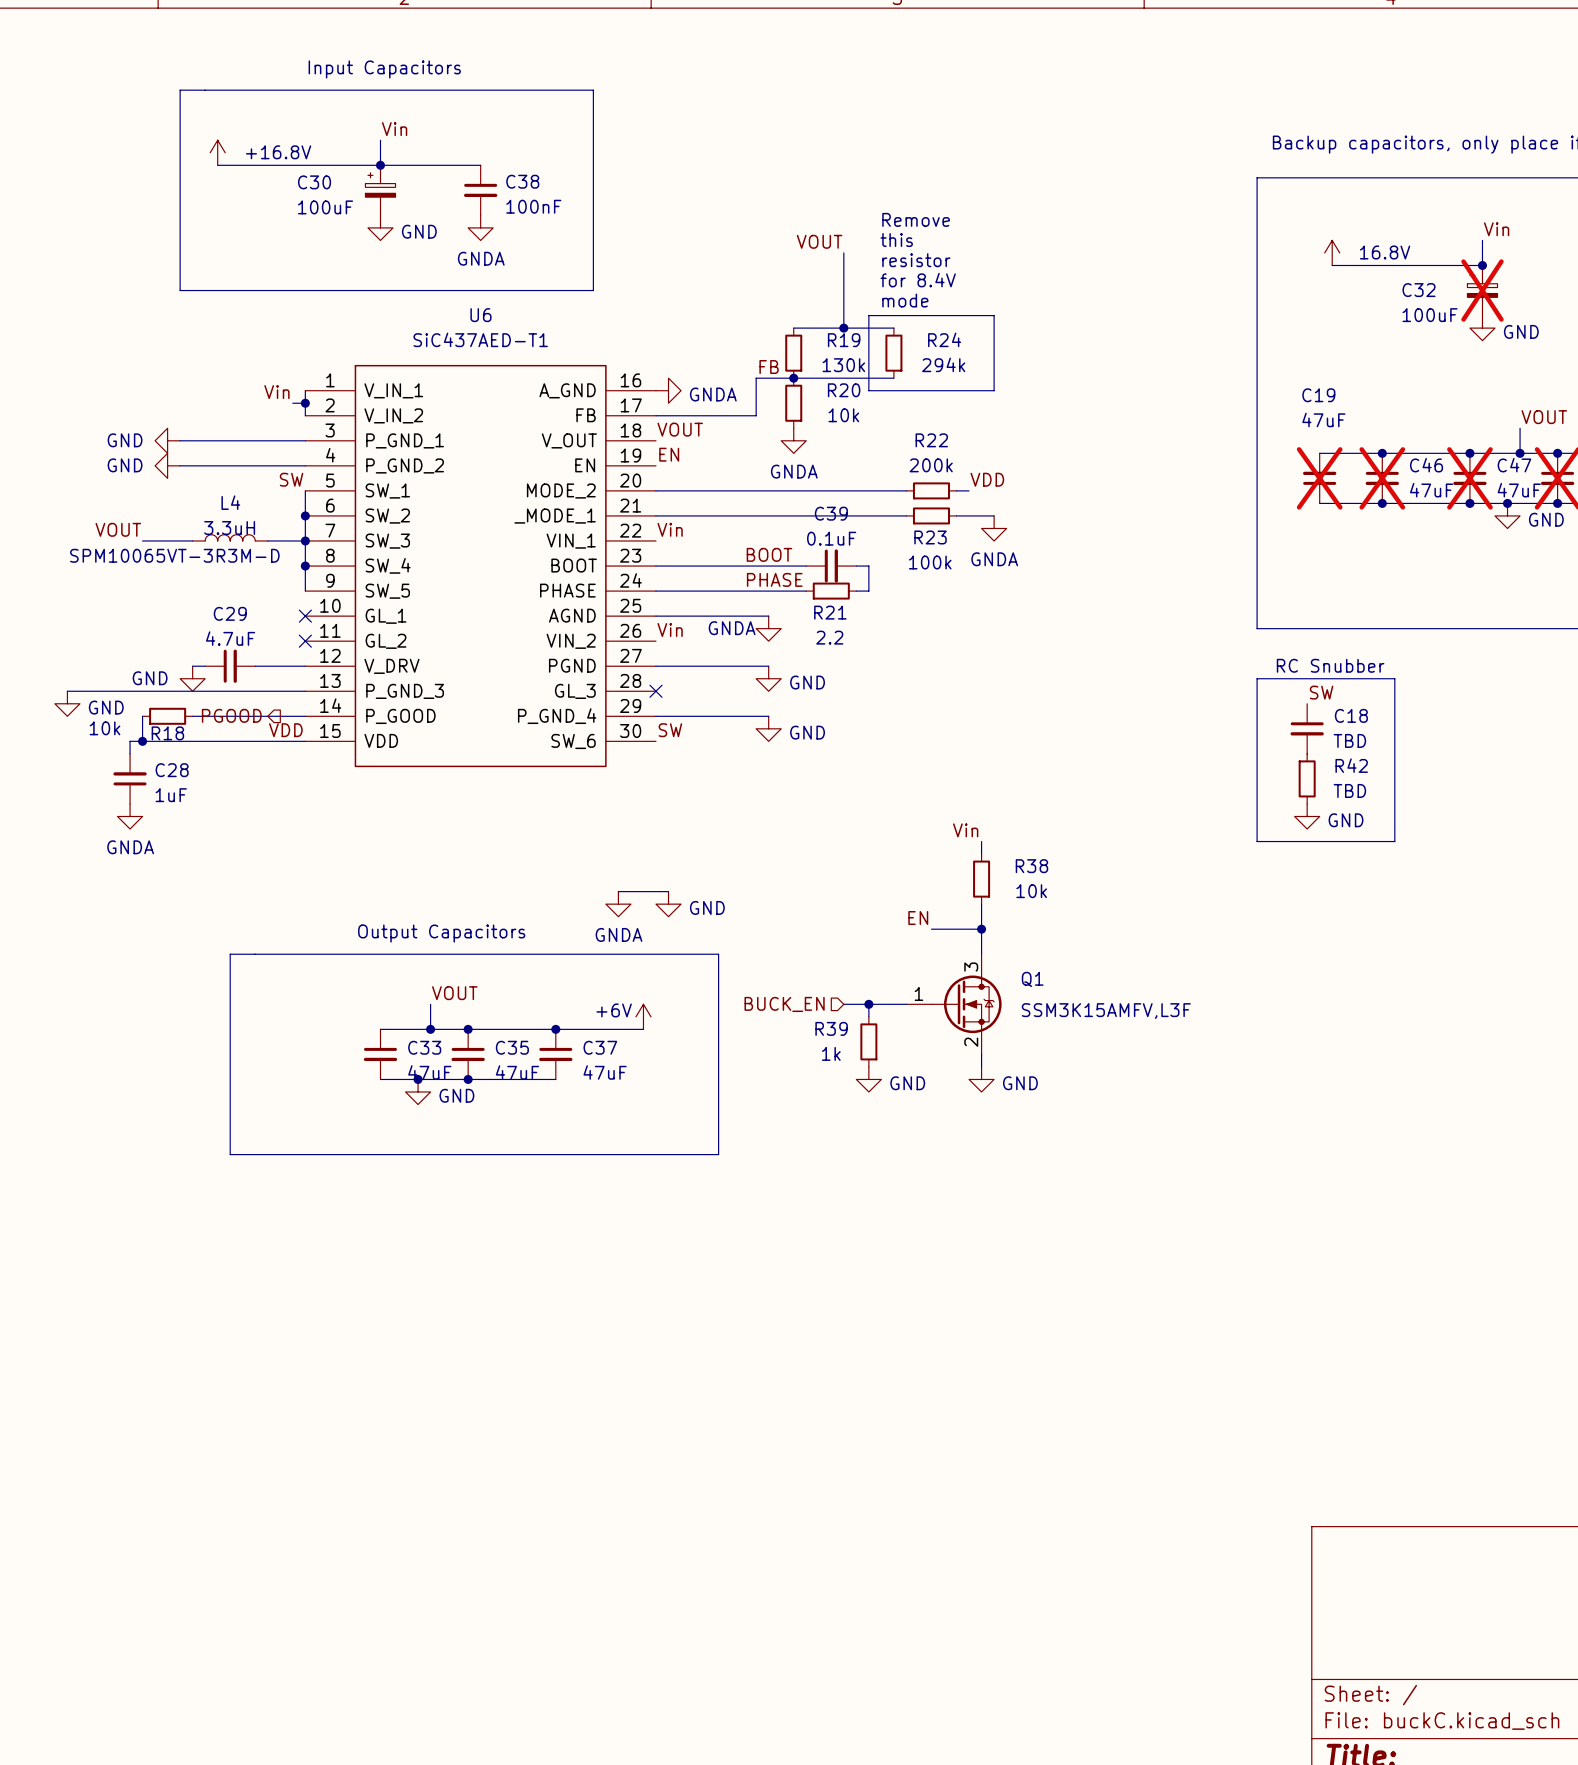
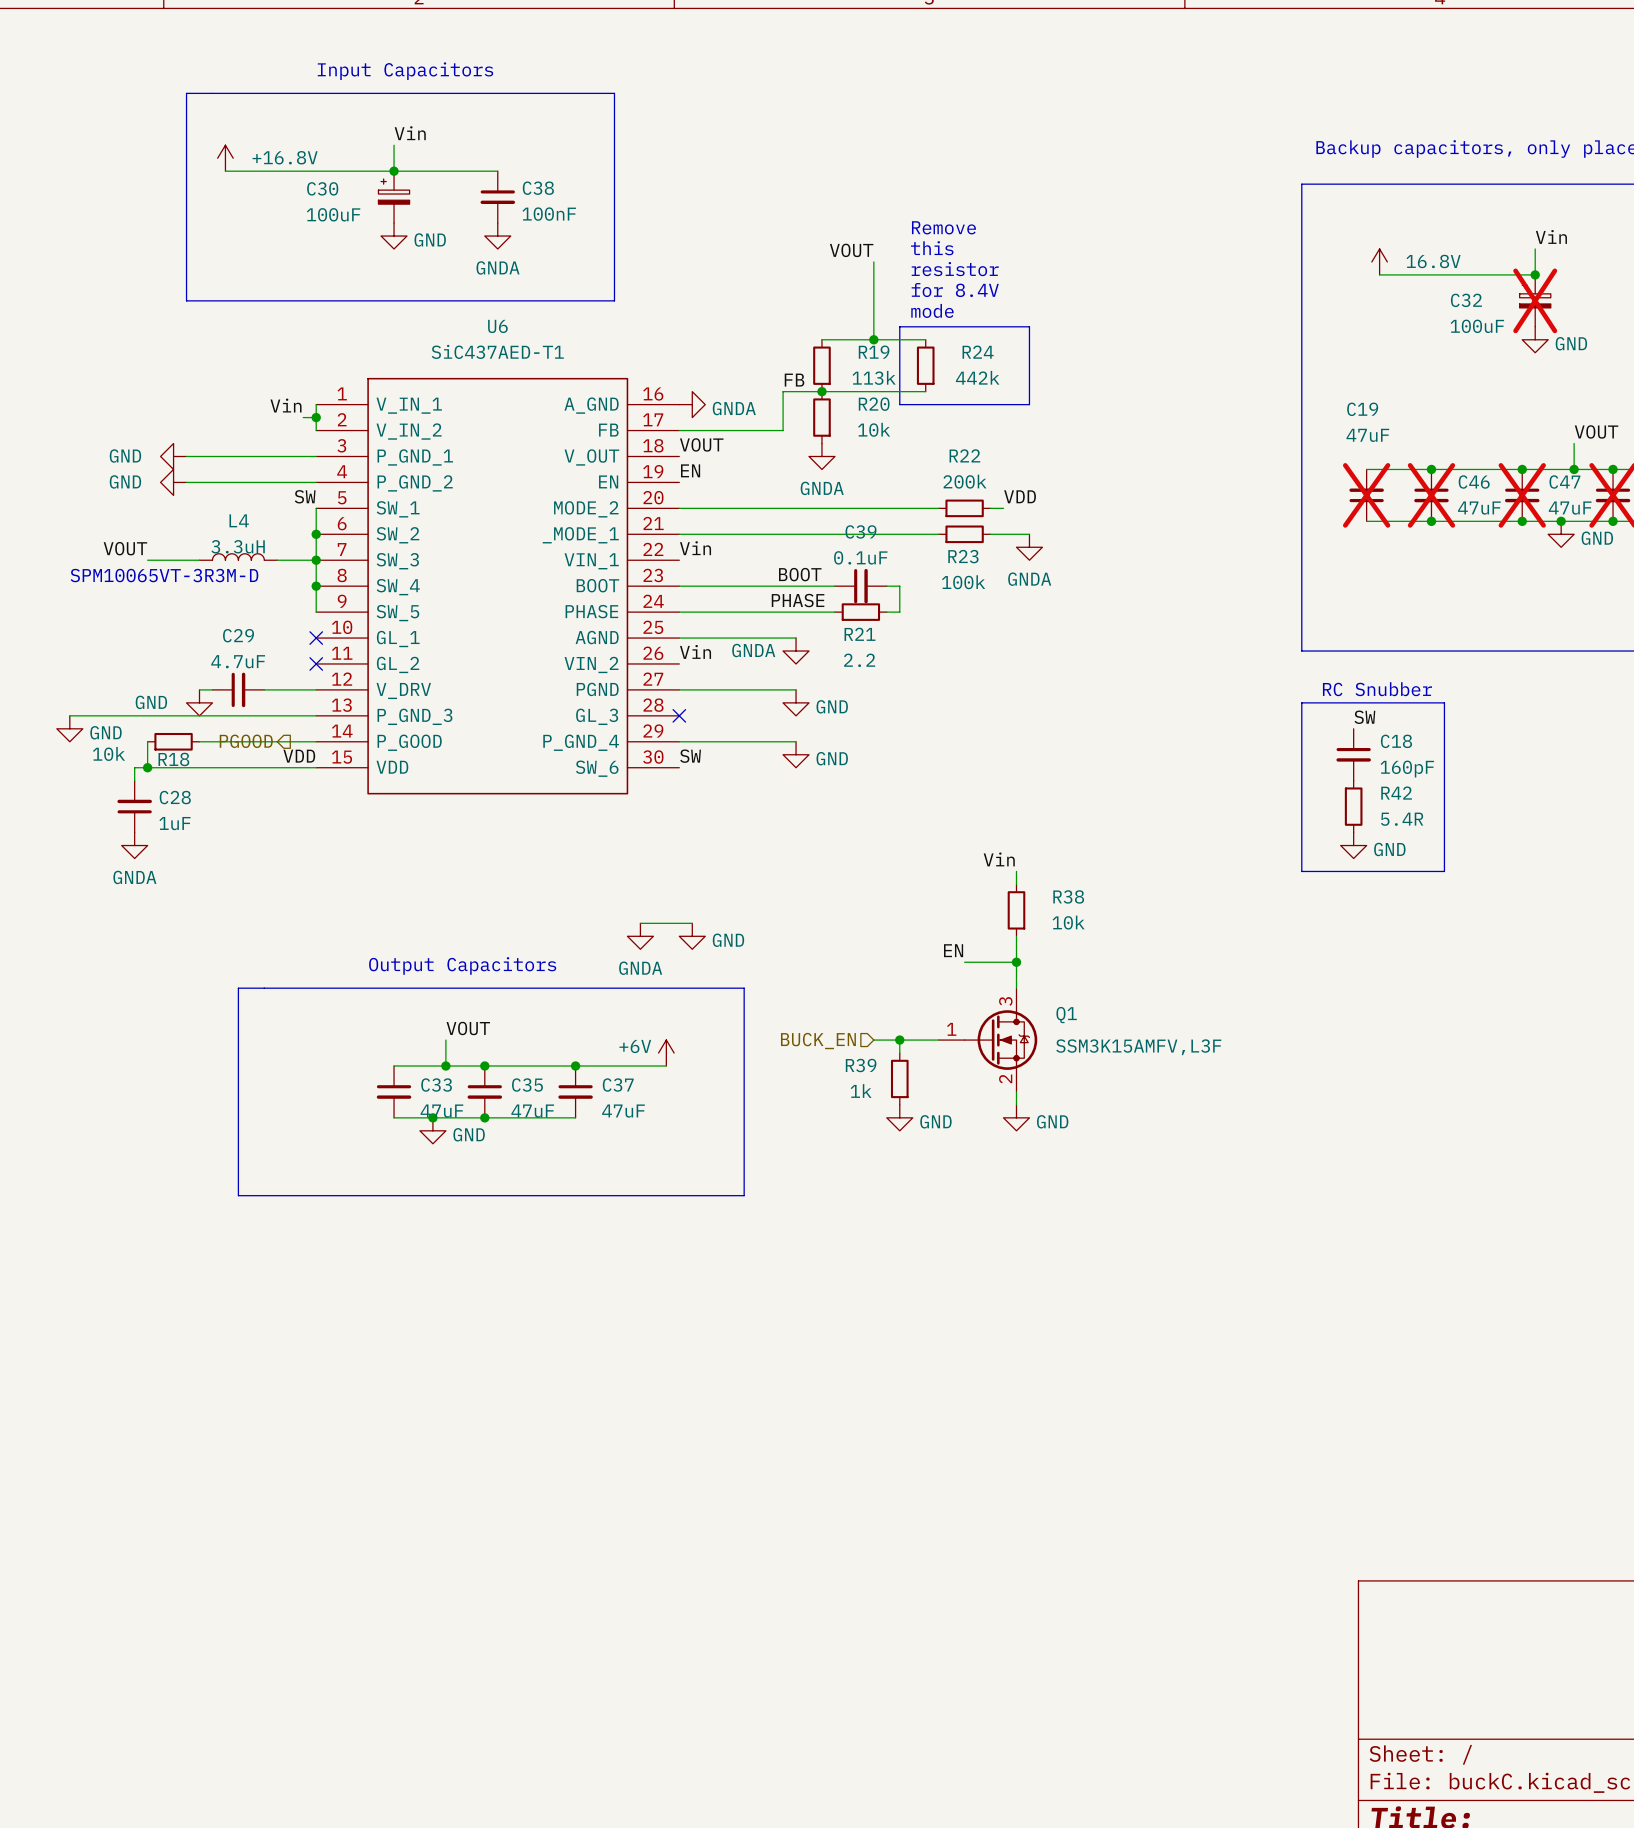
R24 value: 294k (943, 364) -> 442k (977, 377)
R19 value: 130k (843, 365) -> 113k (874, 377)
C18 value: TBD (1349, 740) -> 160pF (1407, 769)
R42 value: TBD (1349, 790) -> 5.4R (1402, 819)

